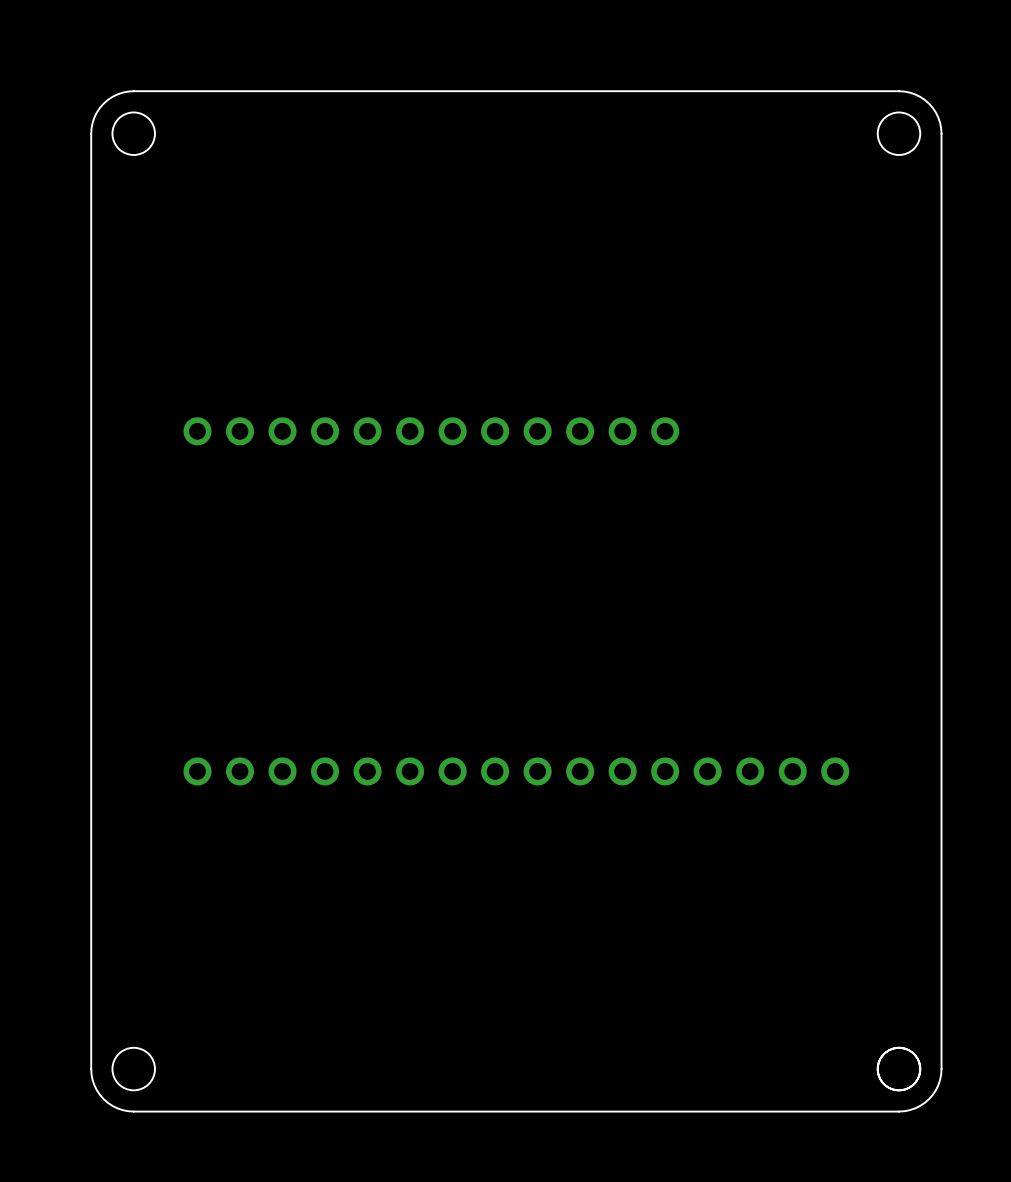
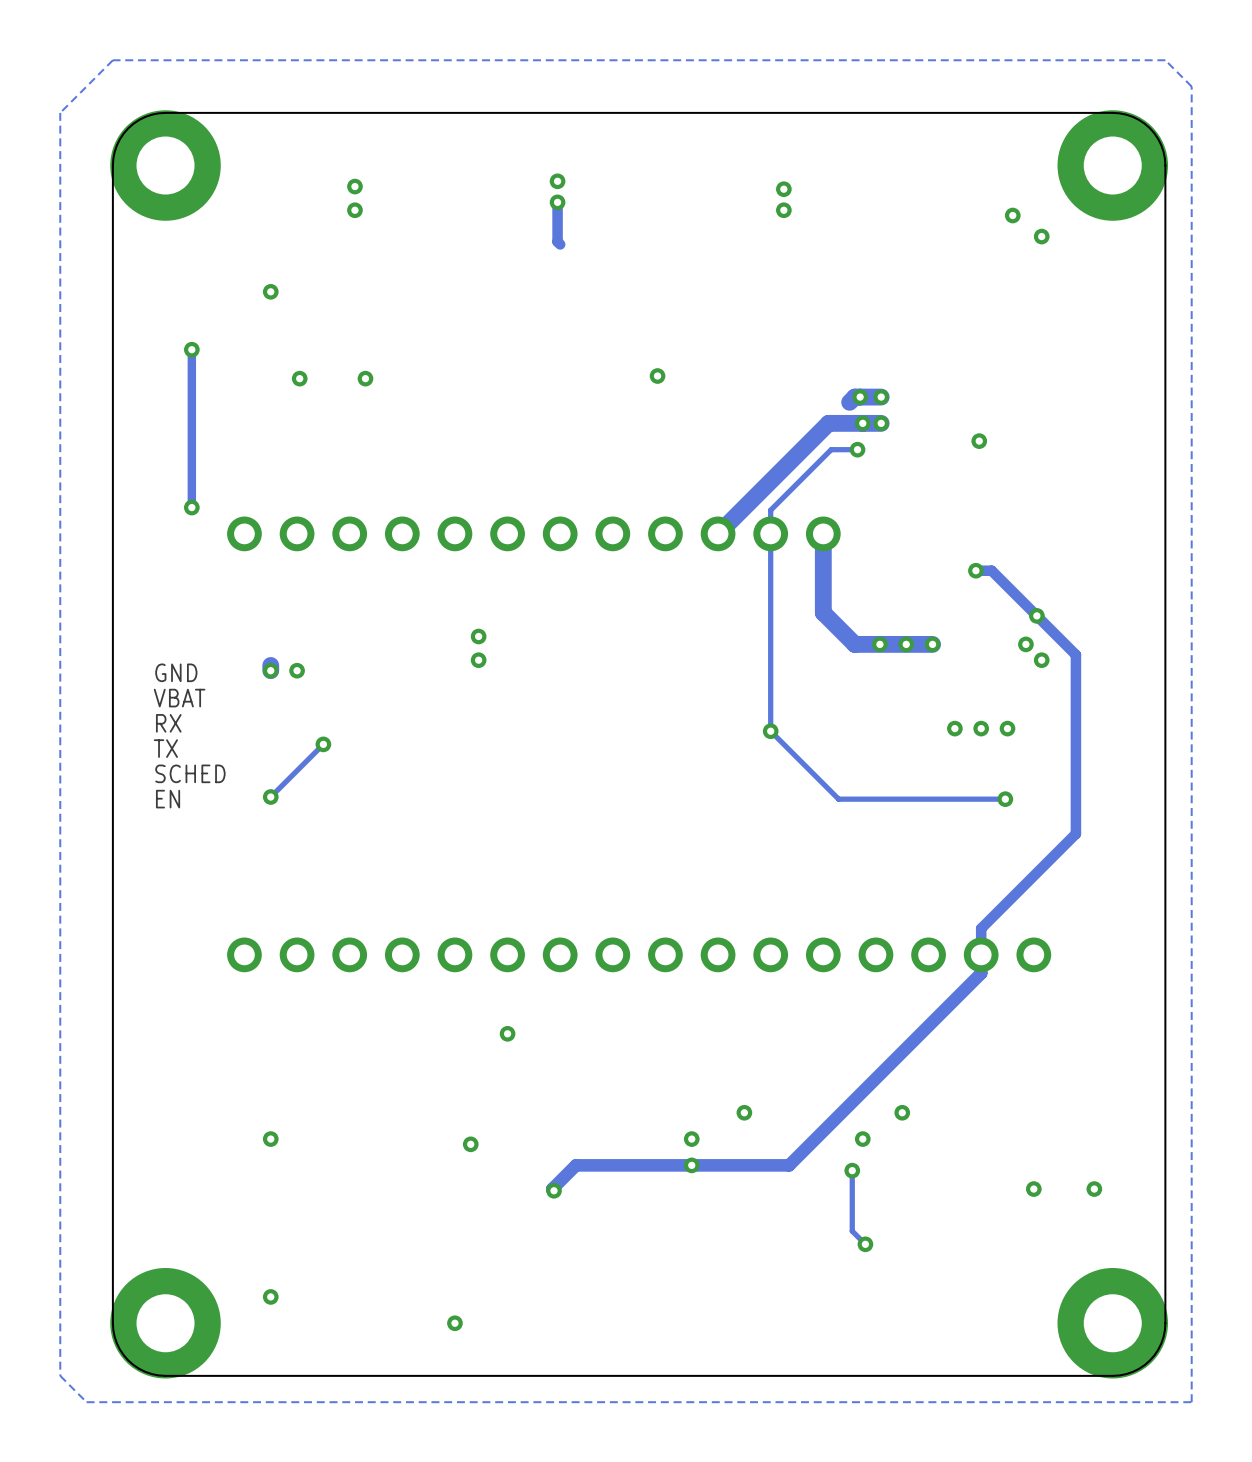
zone outline: none -> (1165, 60) (112, 60) (60, 112) (60, 1375) (86, 1402) (1191, 1402) (1191, 86) (1165, 60)
round board edge: [112, 112, 156, 156] -> none
round board edge: [877, 112, 921, 156] -> none
part: none -> (165, 165)
part: none -> (1112, 165)
via: none -> (557, 181)
via: none -> (354, 186)
via: none -> (783, 189)
track: none -> (557, 202) (557, 241) (560, 244)
via: none -> (557, 202)
via: none -> (354, 210)
via: none -> (783, 210)
via: none -> (1012, 215)
via: none -> (1041, 236)
via: none -> (270, 291)
track: none -> (191, 349) (191, 507)
via: none -> (191, 349)
via: none -> (657, 376)
via: none -> (299, 378)
via: none -> (365, 378)
via: none -> (860, 397)
track: none -> (881, 397) (854, 397) (849, 402)
via: none -> (881, 397)
via: none -> (862, 423)
track: none -> (881, 423) (828, 423) (718, 533)
via: none -> (881, 423)
via: none -> (979, 441)
track: none -> (857, 449) (831, 449) (770, 510) (770, 731) (838, 799) (1005, 799)
via: none -> (857, 449)
via: none -> (191, 507)
track: none -> (823, 533) (823, 612) (854, 644) (932, 644)
track: none -> (975, 570) (991, 570) (1075, 654) (1075, 833) (981, 928) (981, 973) (789, 1165) (575, 1165) (552, 1189) (554, 1190)
via: none -> (975, 570)
via: none -> (1036, 615)
via: none -> (478, 636)
via: none -> (879, 644)
via: none -> (906, 644)
via: none -> (932, 644)
via: none -> (1025, 644)
via: none -> (478, 660)
via: none -> (1041, 660)
track: none -> (270, 665) (270, 670)
via: none -> (270, 670)
via: none -> (297, 670)
text: none -> GND (176, 672)
text: none -> VBAT (179, 698)
text: none -> RX (168, 723)
via: none -> (954, 728)
via: none -> (981, 728)
via: none -> (1007, 728)
via: none -> (770, 731)
track: none -> (323, 744) (270, 797)
via: none -> (323, 744)
text: none -> TX (165, 748)
text: none -> SCHED (190, 773)
via: none -> (270, 797)
text: none -> EN (168, 799)
via: none -> (1005, 799)
via: none -> (507, 1033)
via: none -> (744, 1112)
via: none -> (902, 1112)
via: none -> (270, 1139)
via: none -> (691, 1139)
via: none -> (862, 1139)
via: none -> (470, 1144)
via: none -> (691, 1165)
track: none -> (852, 1170) (852, 1231) (865, 1244)
via: none -> (852, 1170)
via: none -> (1033, 1189)
via: none -> (1094, 1189)
via: none -> (554, 1190)
via: none -> (865, 1244)
round board edge: [112, 1047, 156, 1091] -> none
via: none -> (270, 1296)
round board edge: [877, 1047, 921, 1091] -> none
part: none -> (165, 1323)
via: none -> (454, 1323)
part: none -> (1112, 1323)

